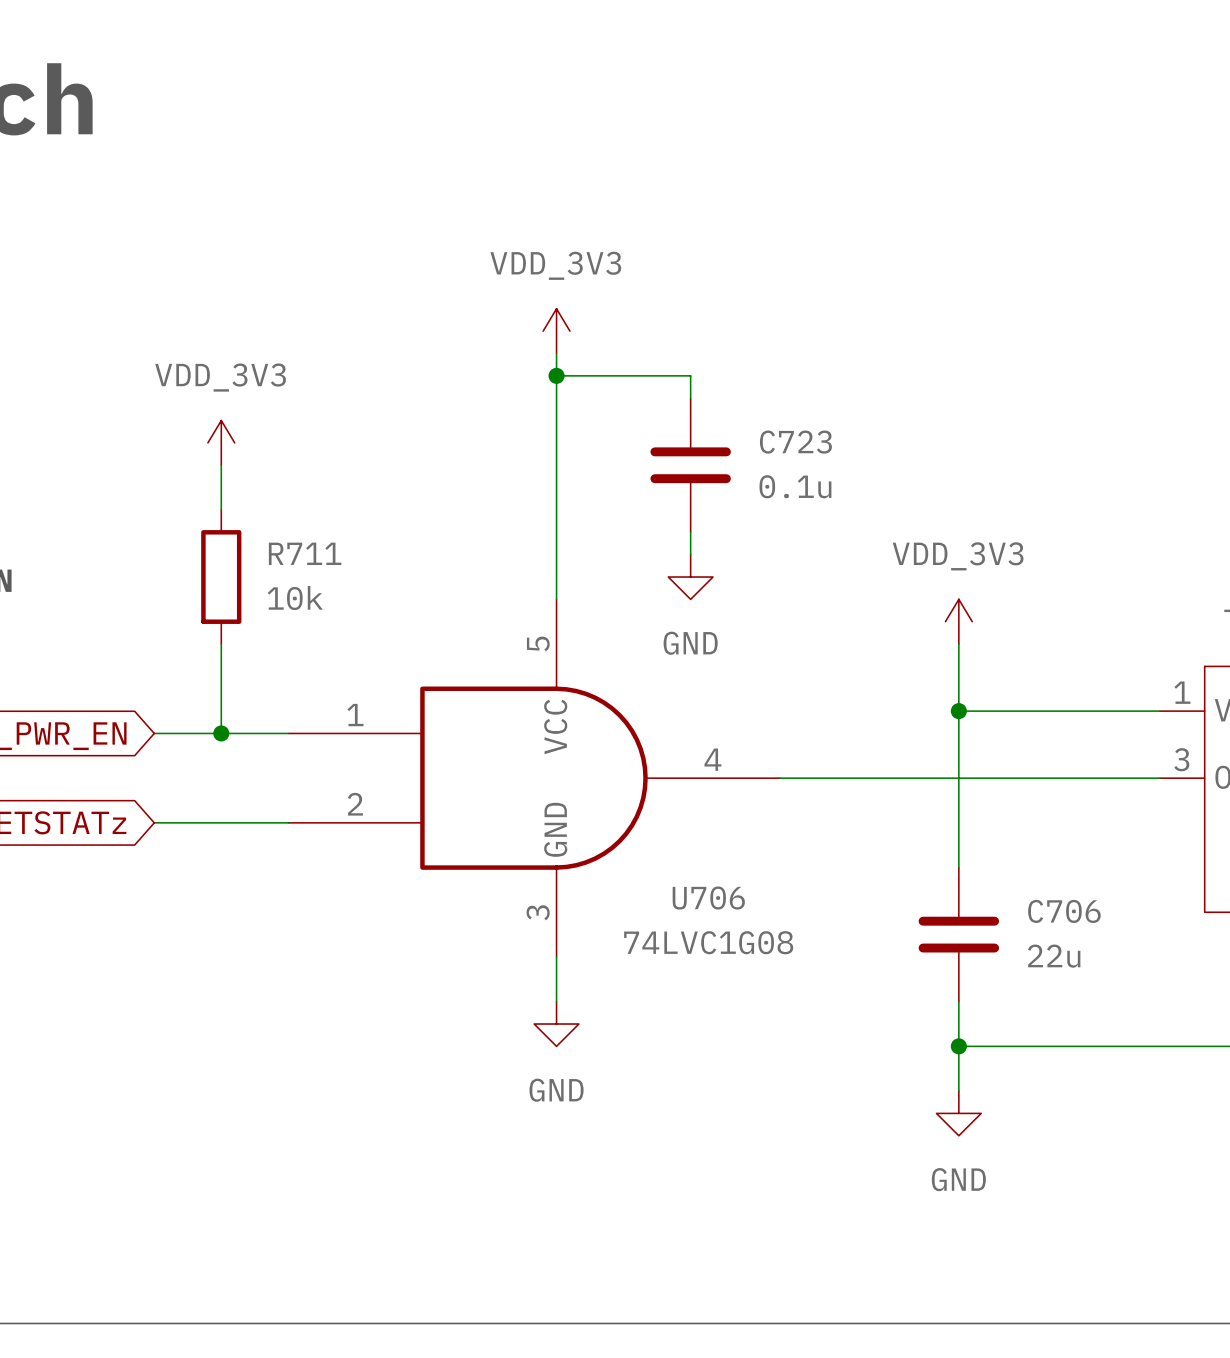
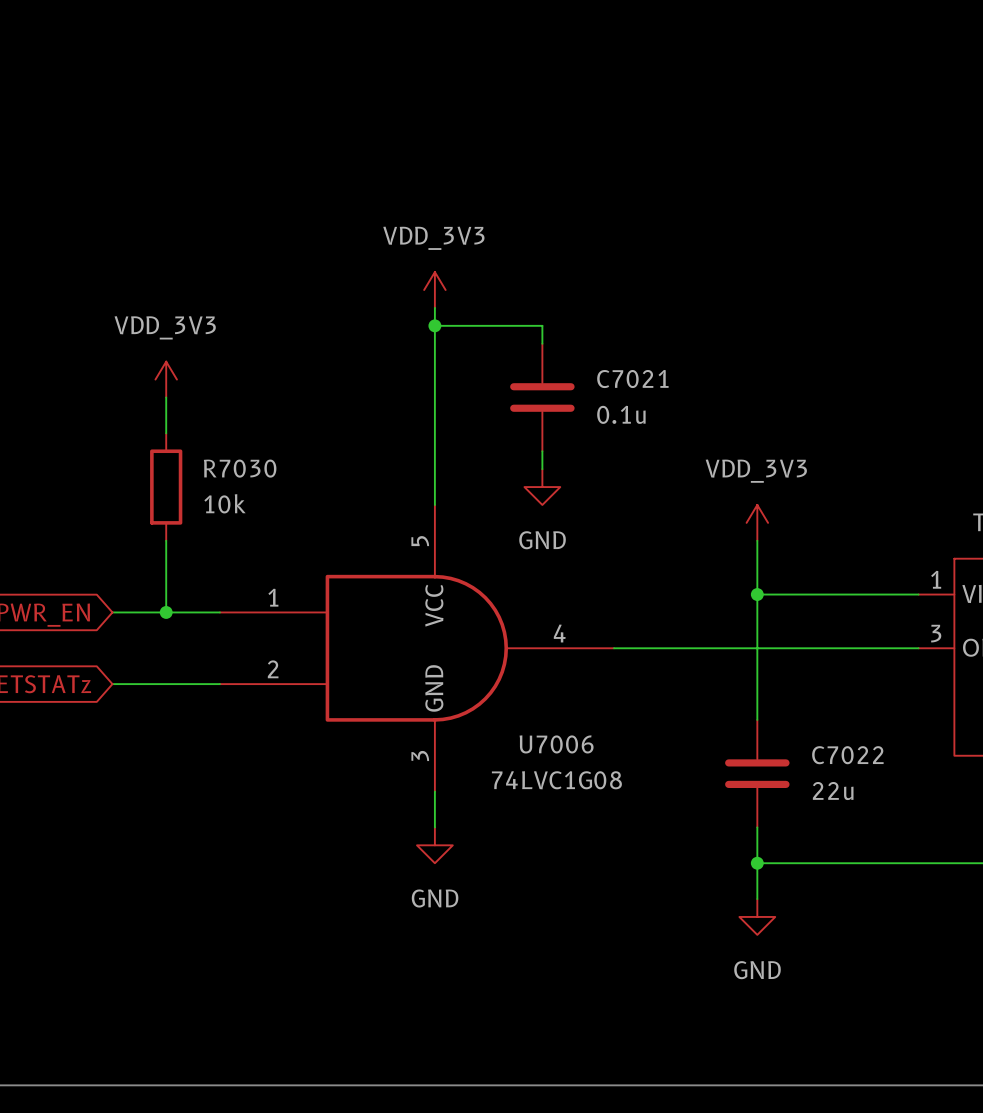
C723 name: C723 (795, 442) -> C7021 (632, 379)
R711 name: R711 (305, 553) -> R7030 (240, 468)
U706 name: U706 (708, 898) -> U7006 (556, 744)
C706 name: C706 (1064, 911) -> C7022 (847, 755)

